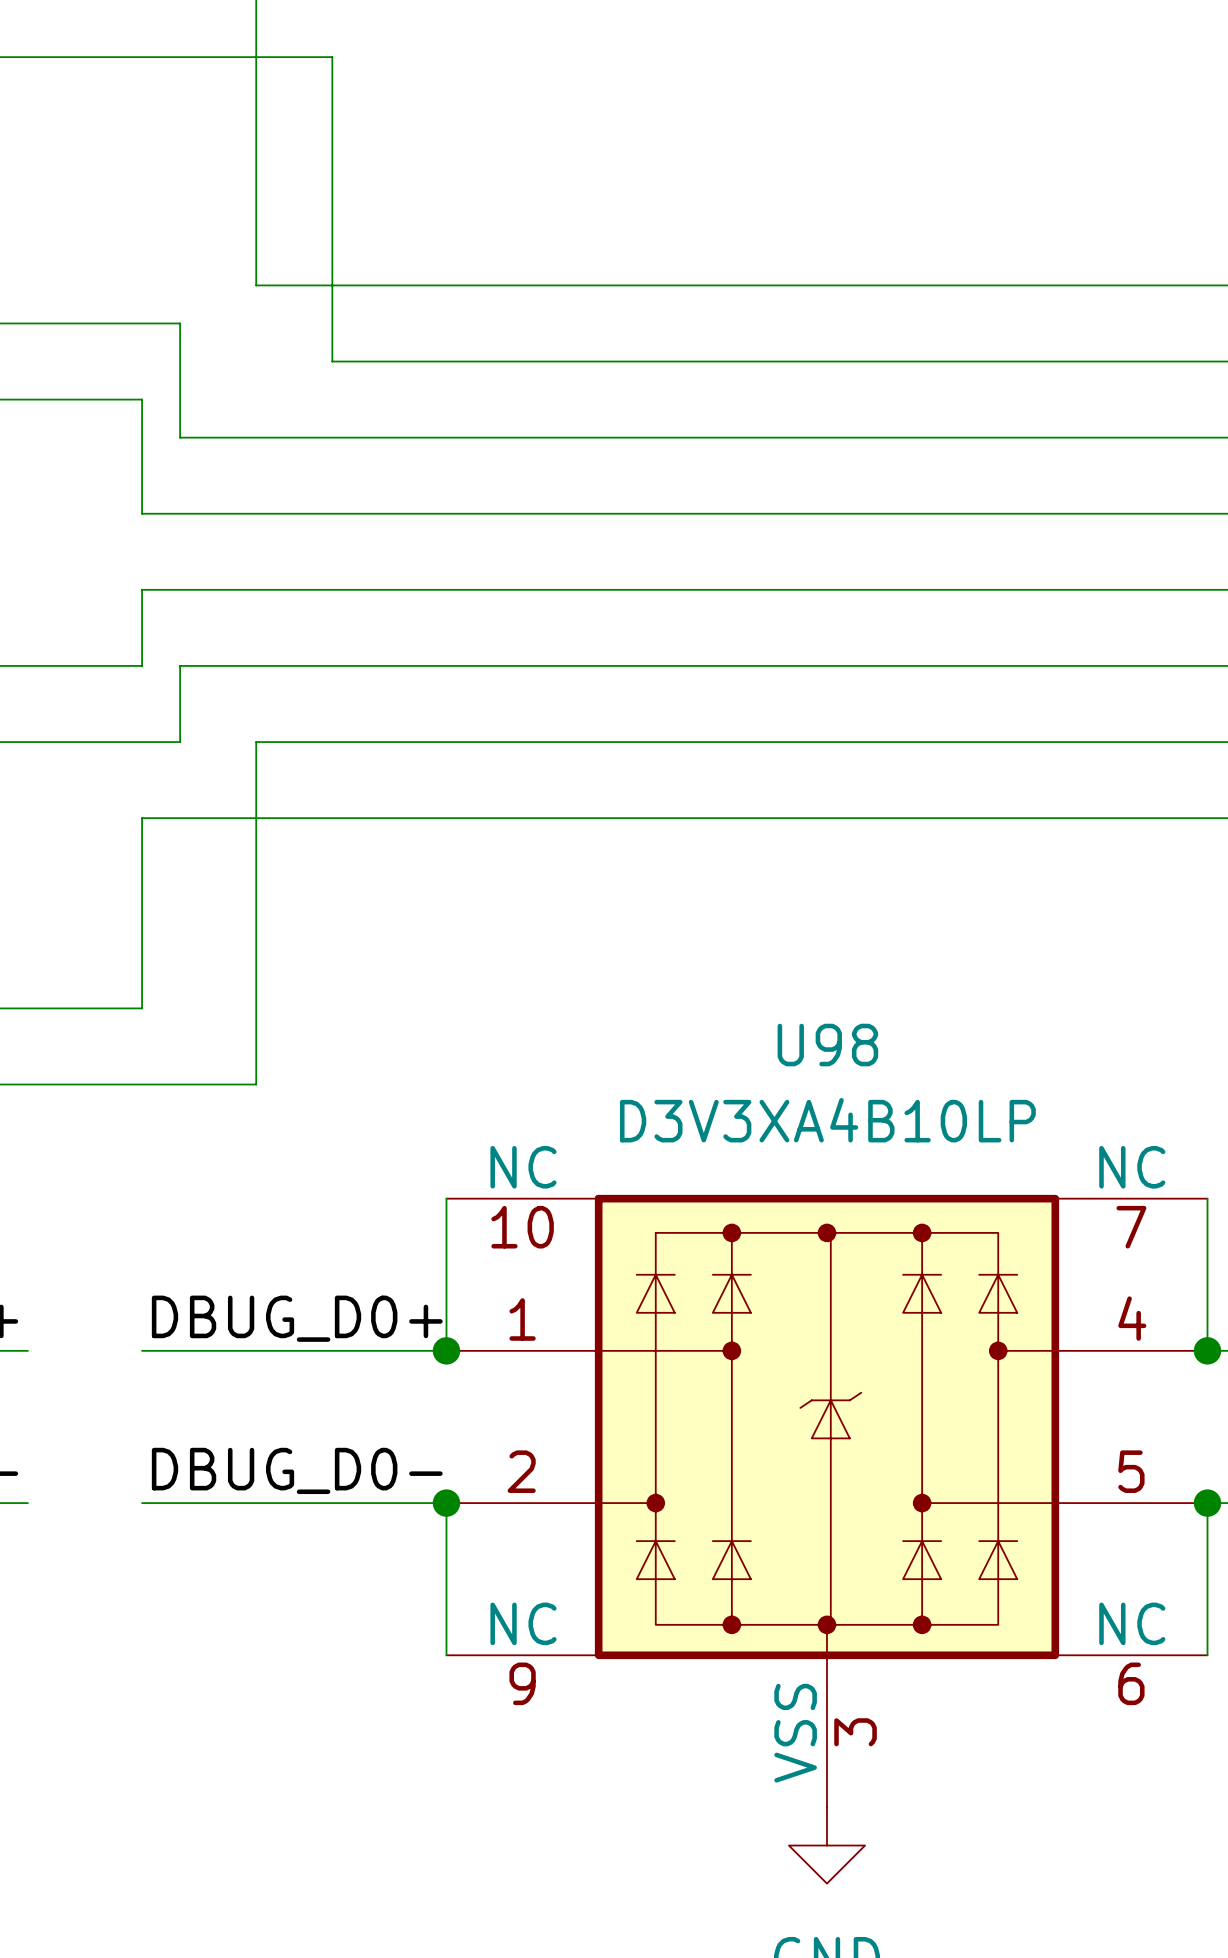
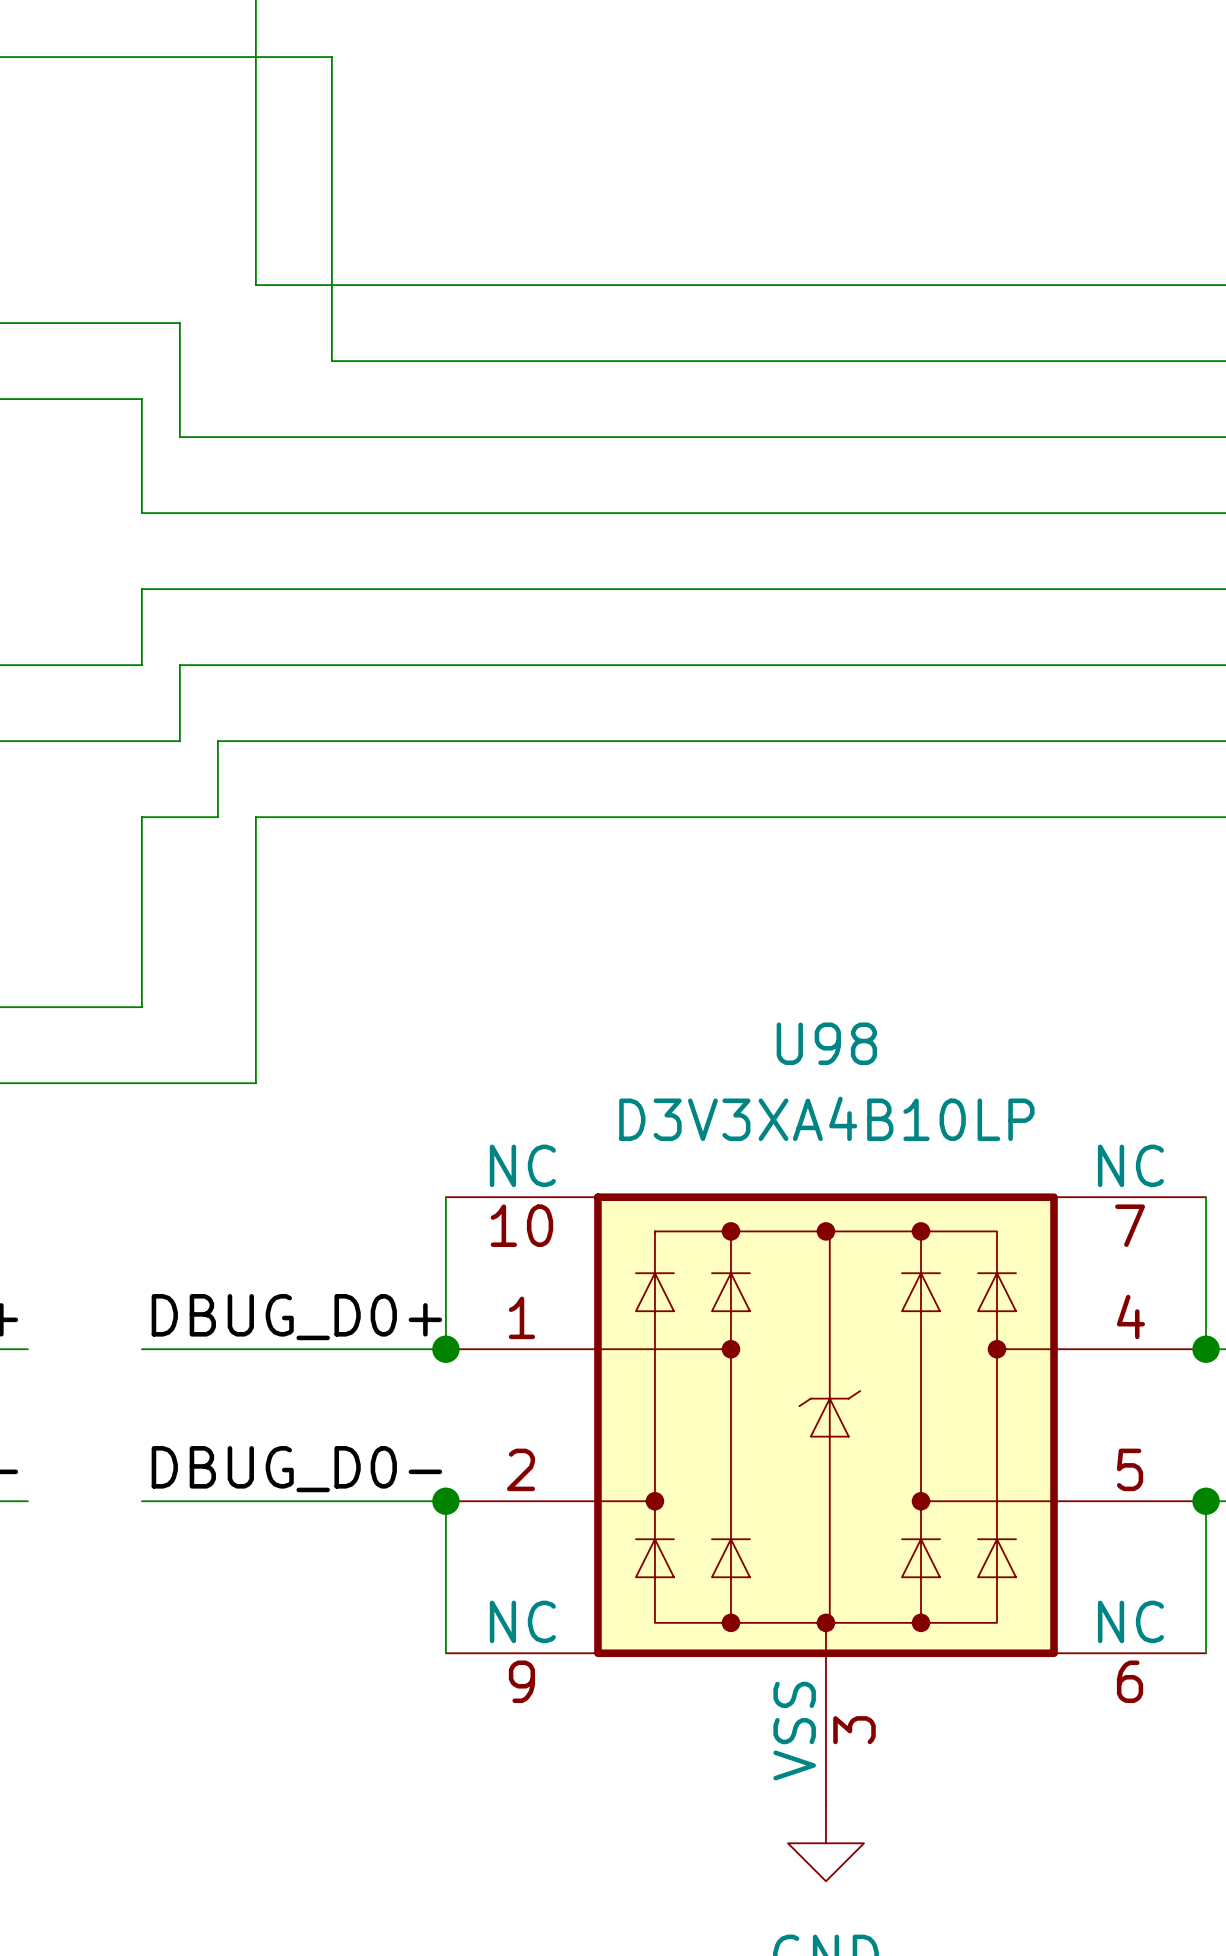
wire: (256, 742) (256, 818) (218, 818) -> (255, 741) (217, 741) (217, 817)

